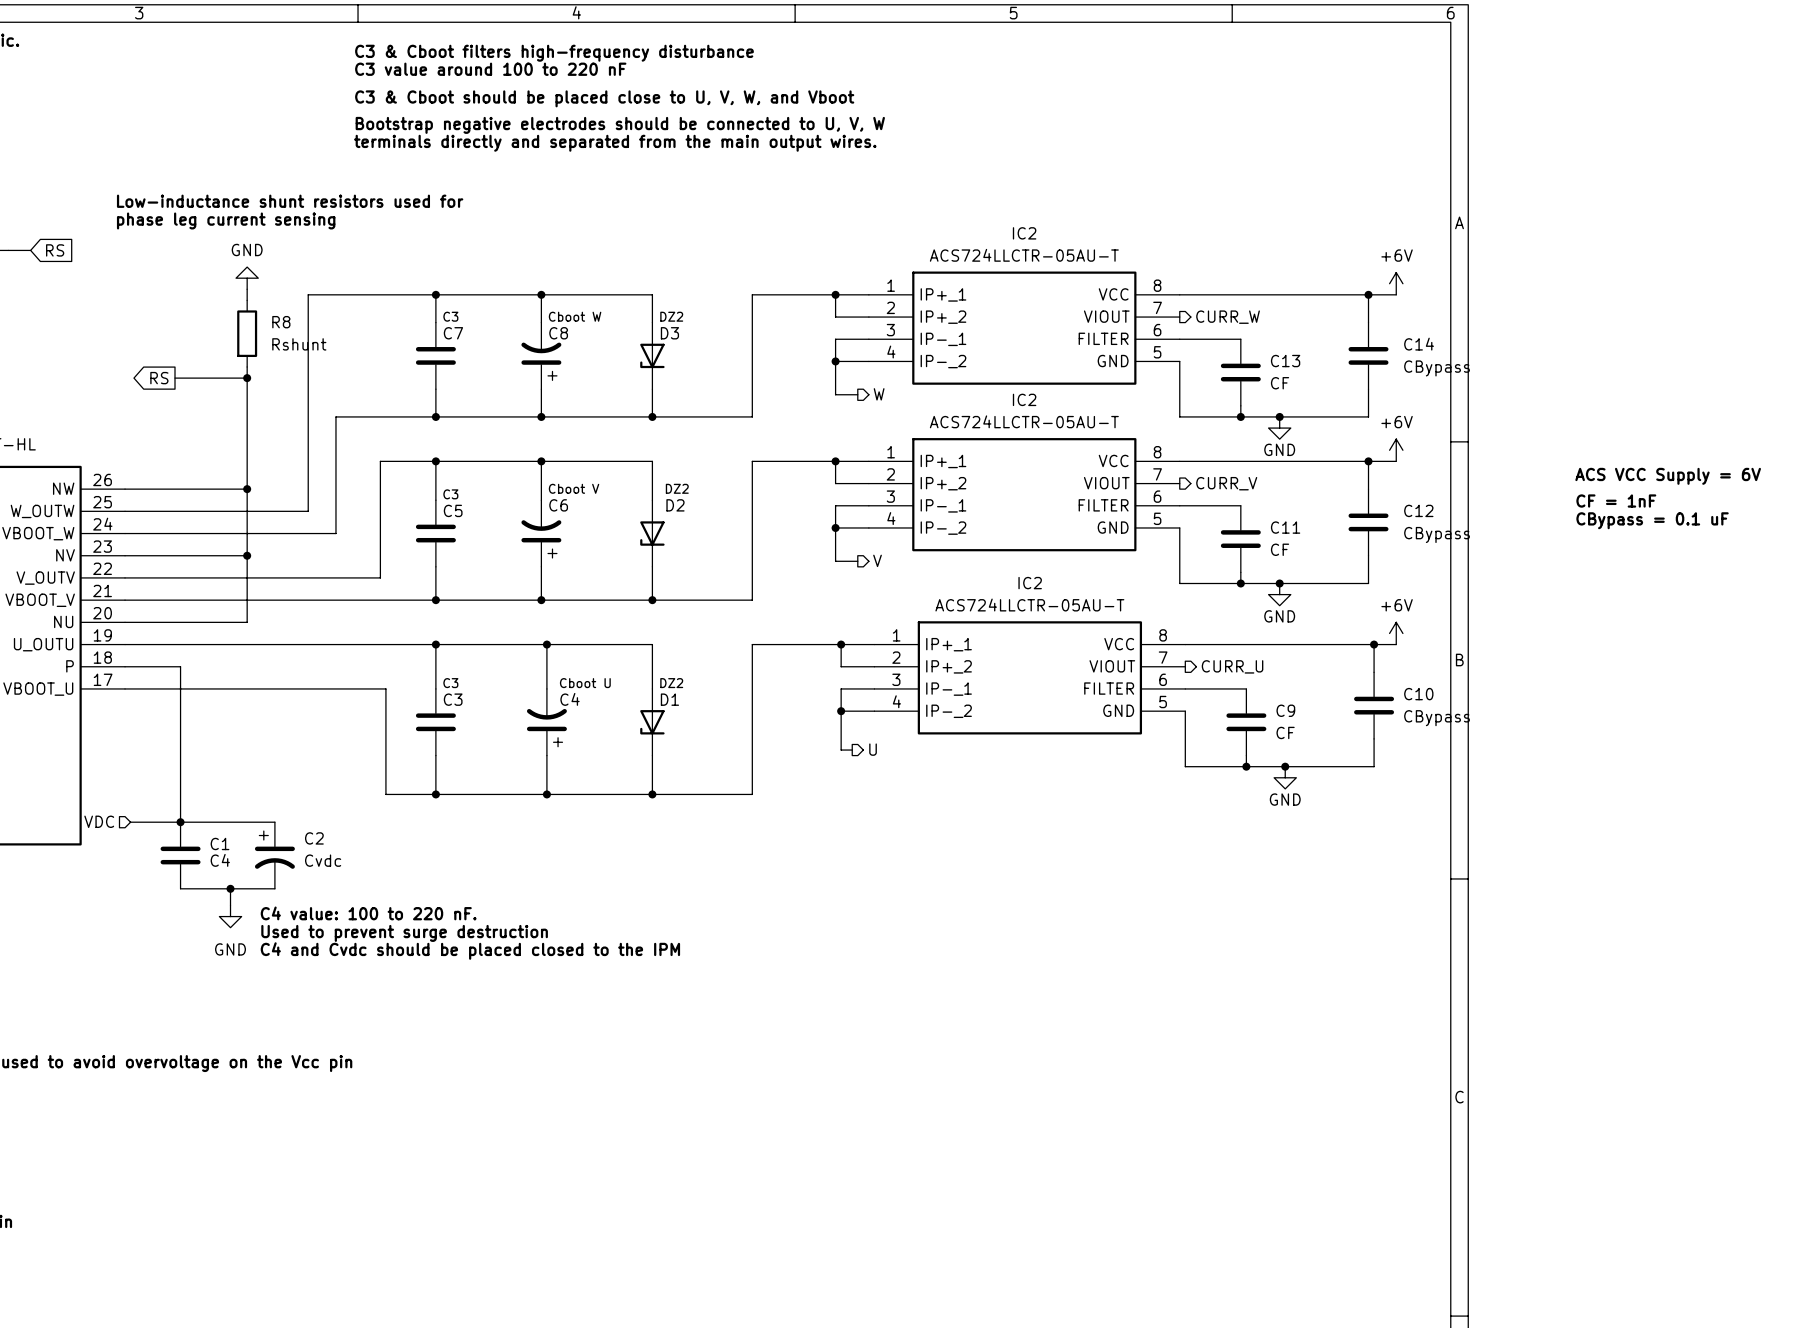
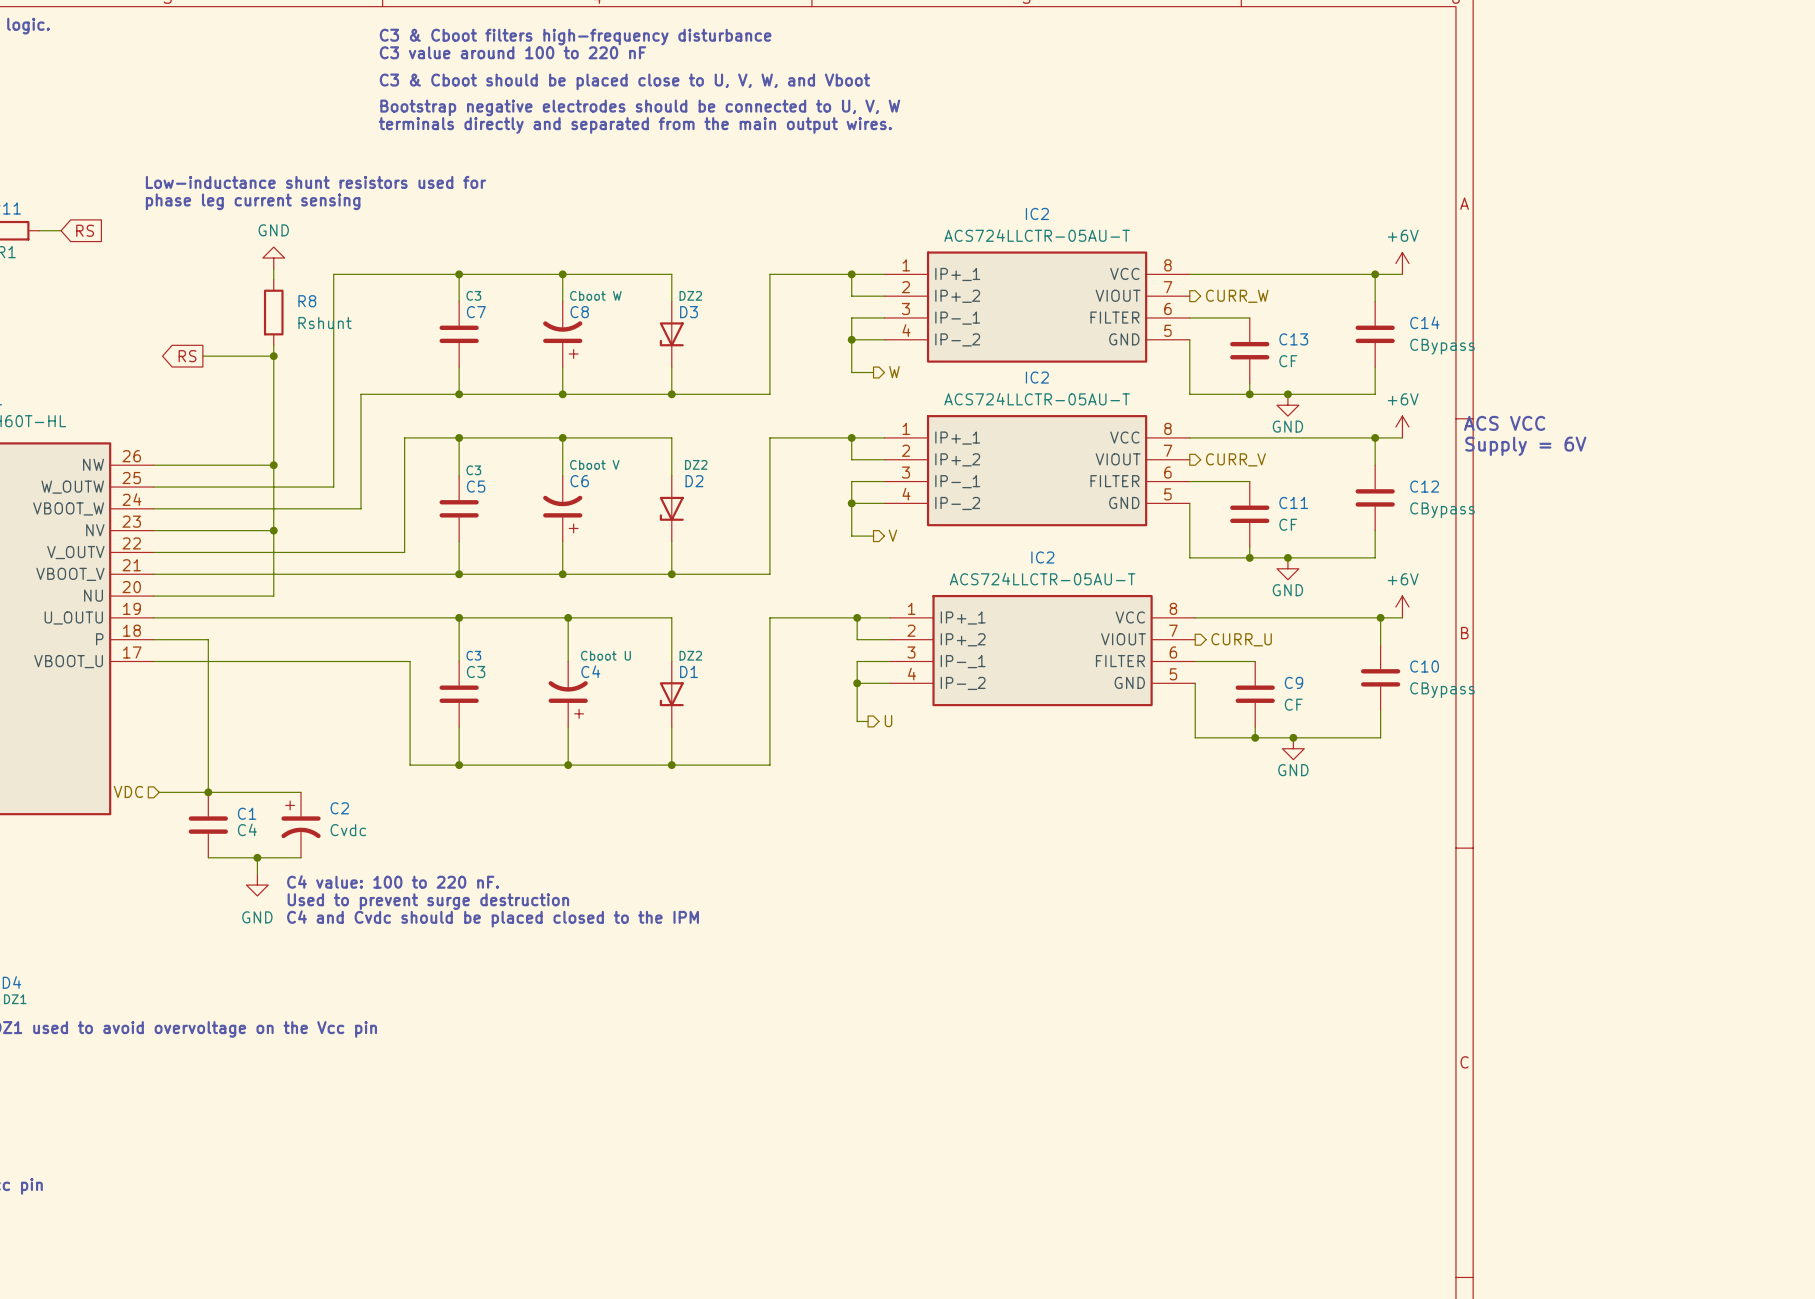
text: none -> ACS VCC (1504, 423)
text: ACS VCC Supply = 6V (1668, 476) -> Supply = 6V (1525, 446)
text: CF = 1nF (1616, 501) -> none
text: CBypass = 0.1 uF (1652, 520) -> none

